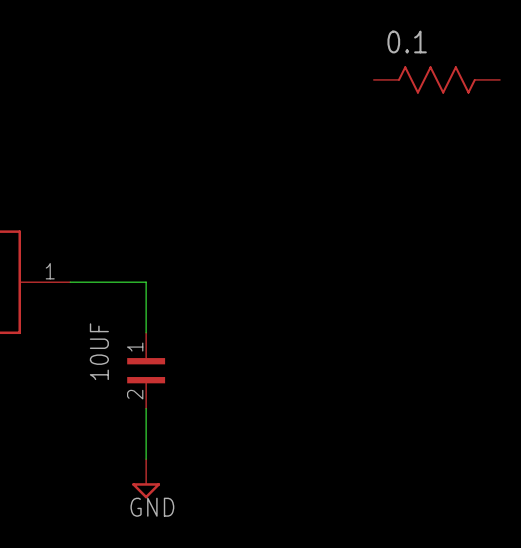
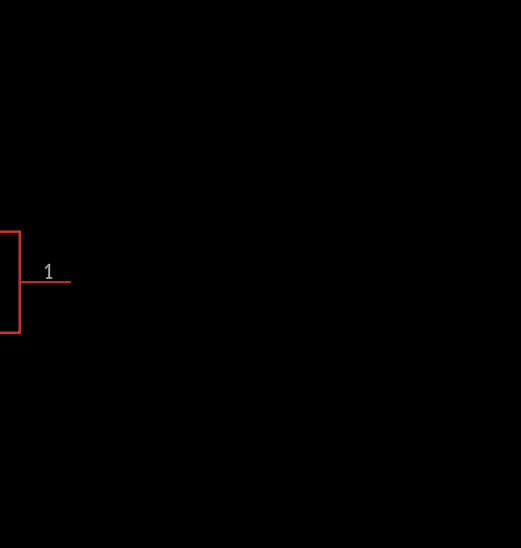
0.1: (436, 79) -> none
wire: (70, 282) (146, 282) (146, 332) -> none
10UF: (146, 370) -> none
wire: (146, 408) (146, 459) -> none
power symbol: GND (146, 478) -> none

